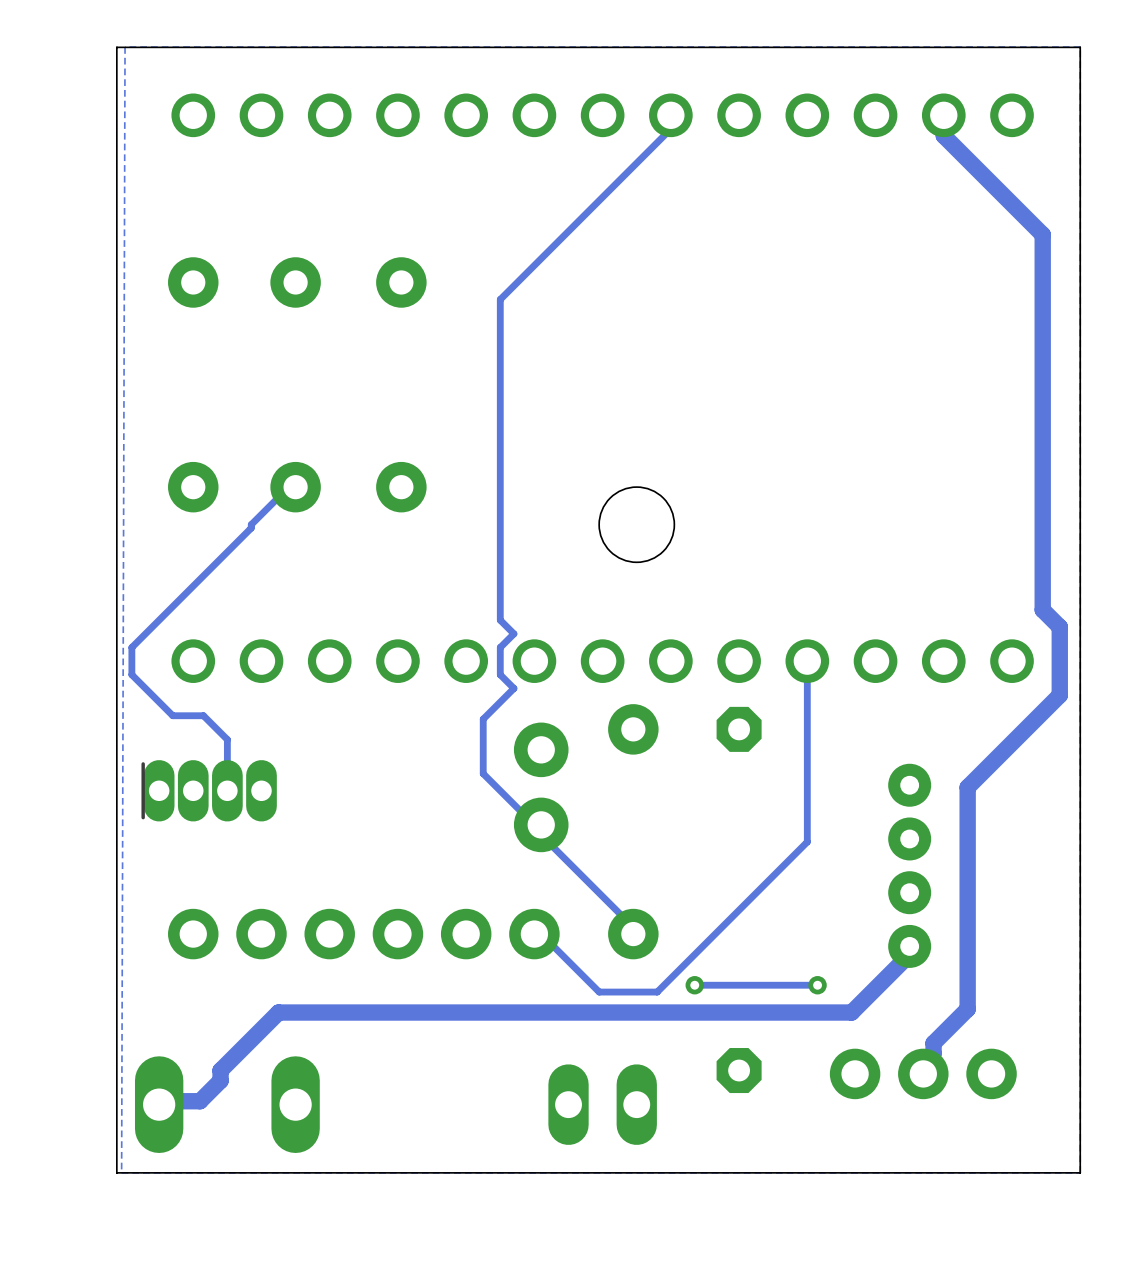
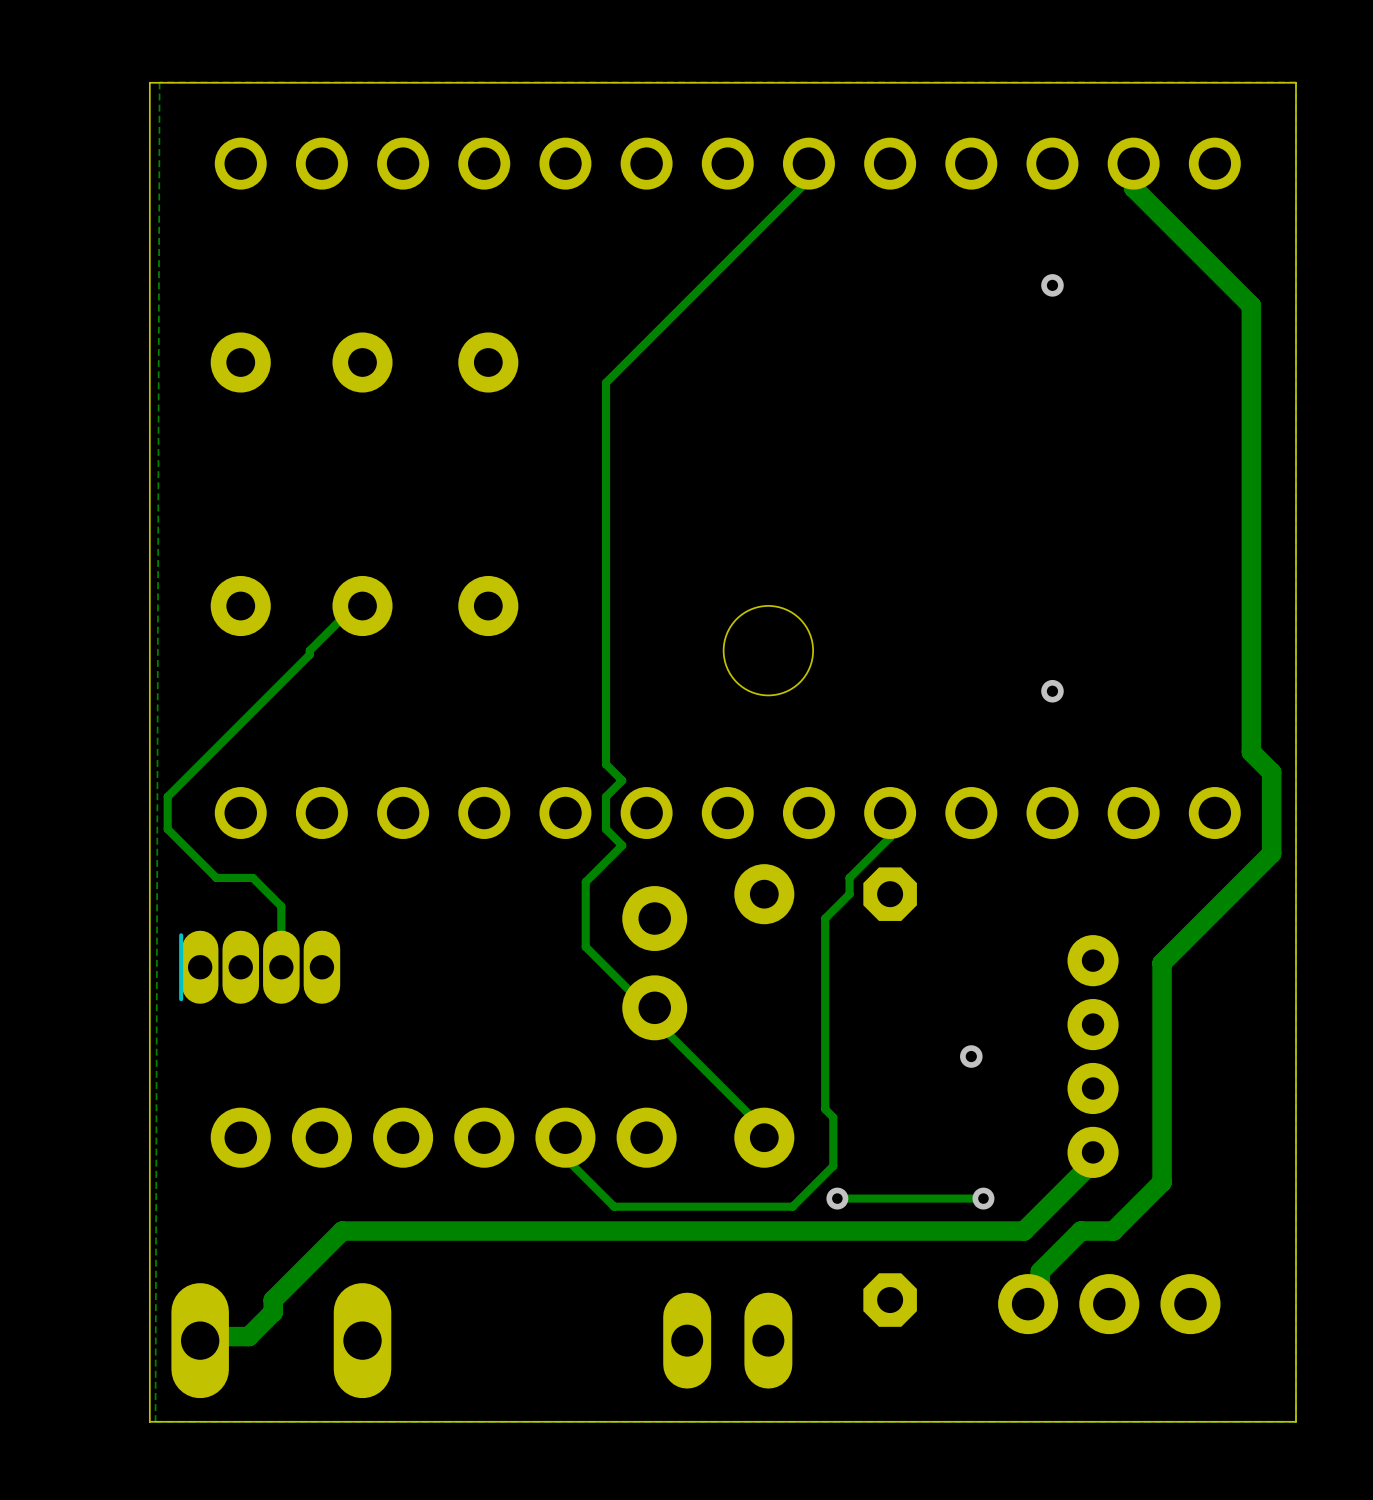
via: none -> (1052, 285)
via: none -> (1052, 691)
track: (807, 661) (807, 841) (691, 957) -> (890, 813) (890, 837) (849, 877) (849, 894) (825, 918) (825, 1109) (833, 1117) (833, 1166)
via: none -> (971, 1056)
track: (534, 934) (541, 934) (599, 992) -> (565, 1137) (565, 1157) (614, 1206) (723, 1206)
track: (967, 971) (967, 1009) (933, 1043) (933, 1053) (923, 1063) (923, 1073) -> (1162, 1182) (1113, 1231) (1080, 1231) (1040, 1271) (1040, 1279) (1028, 1291) (1028, 1304)

